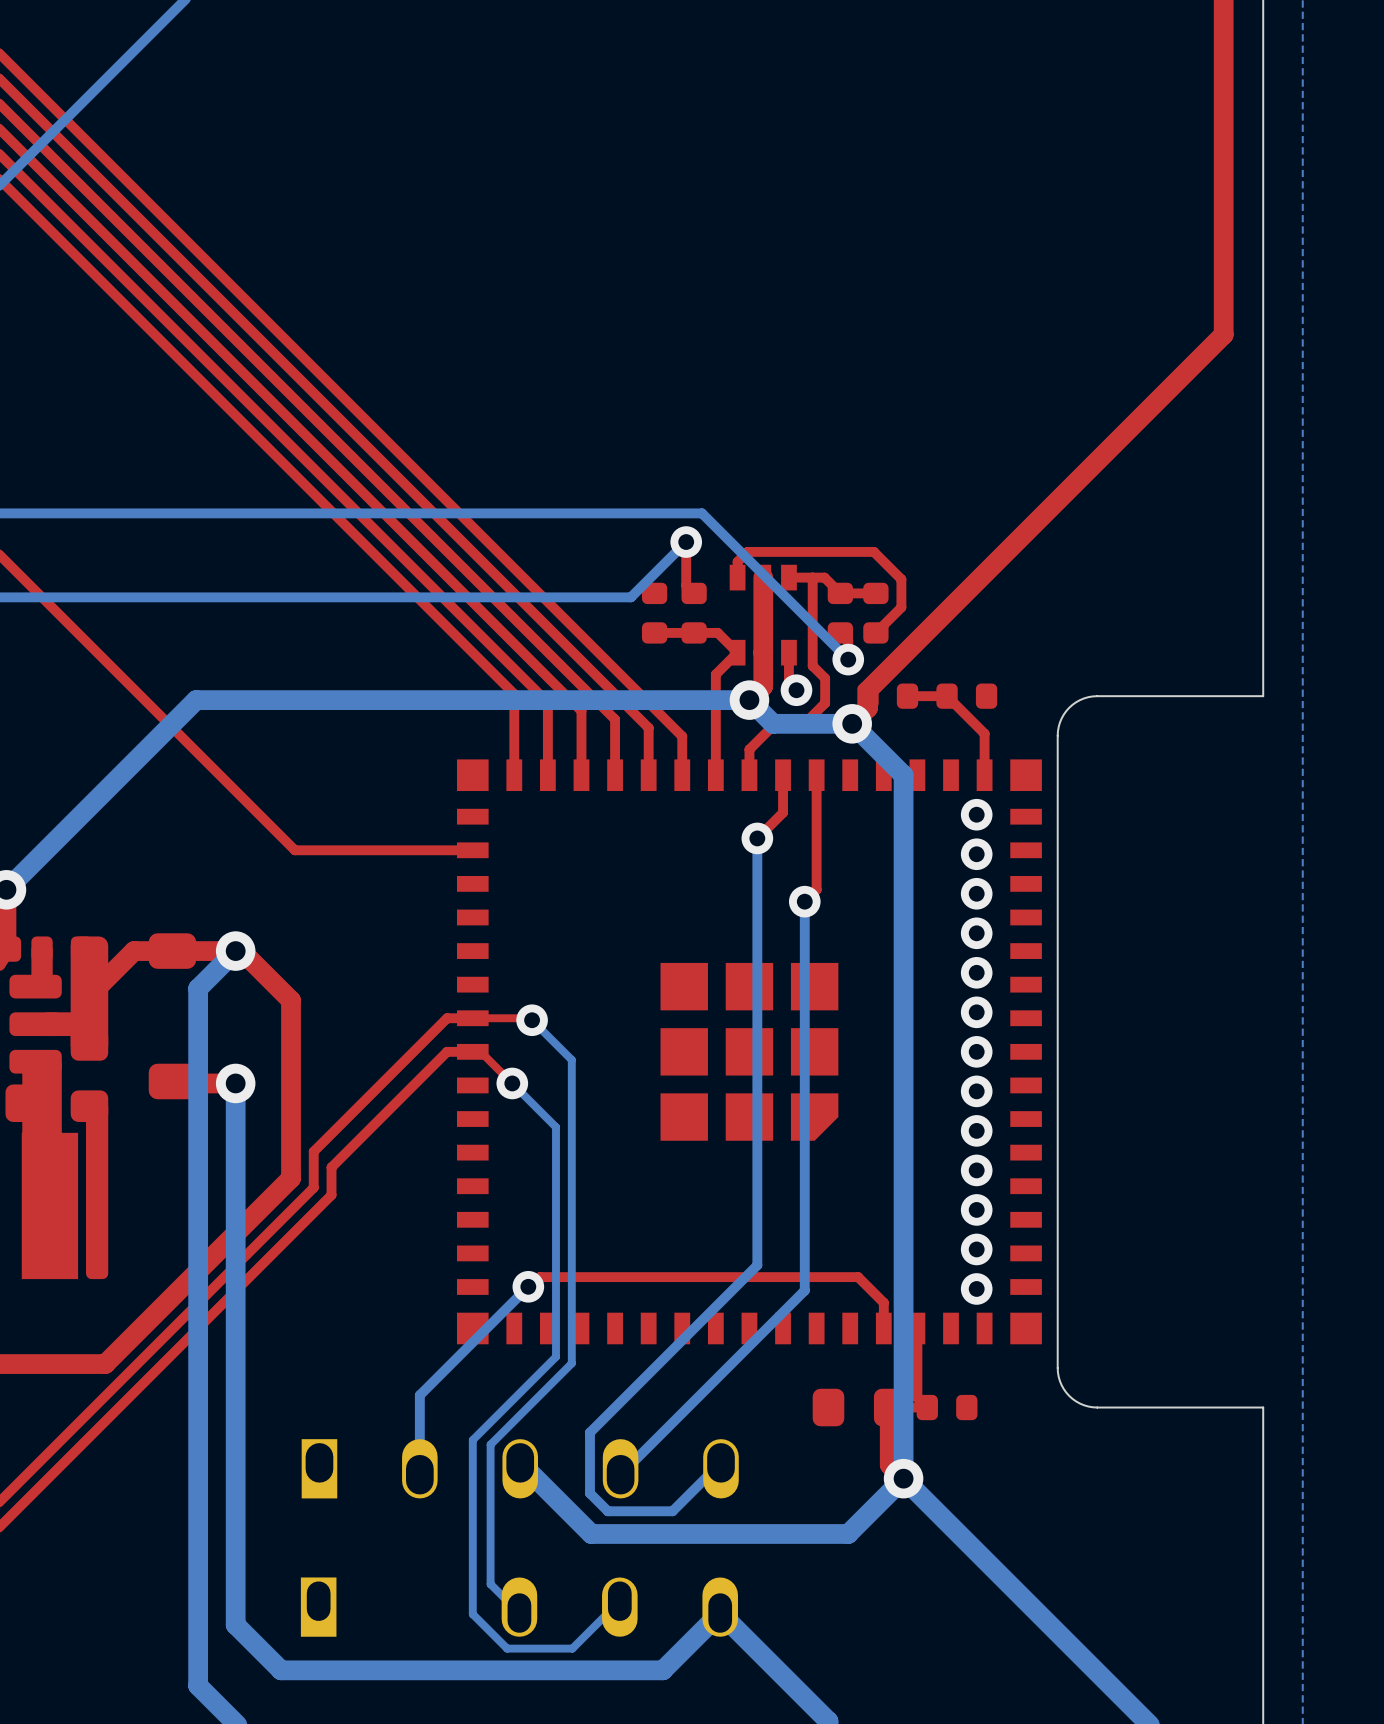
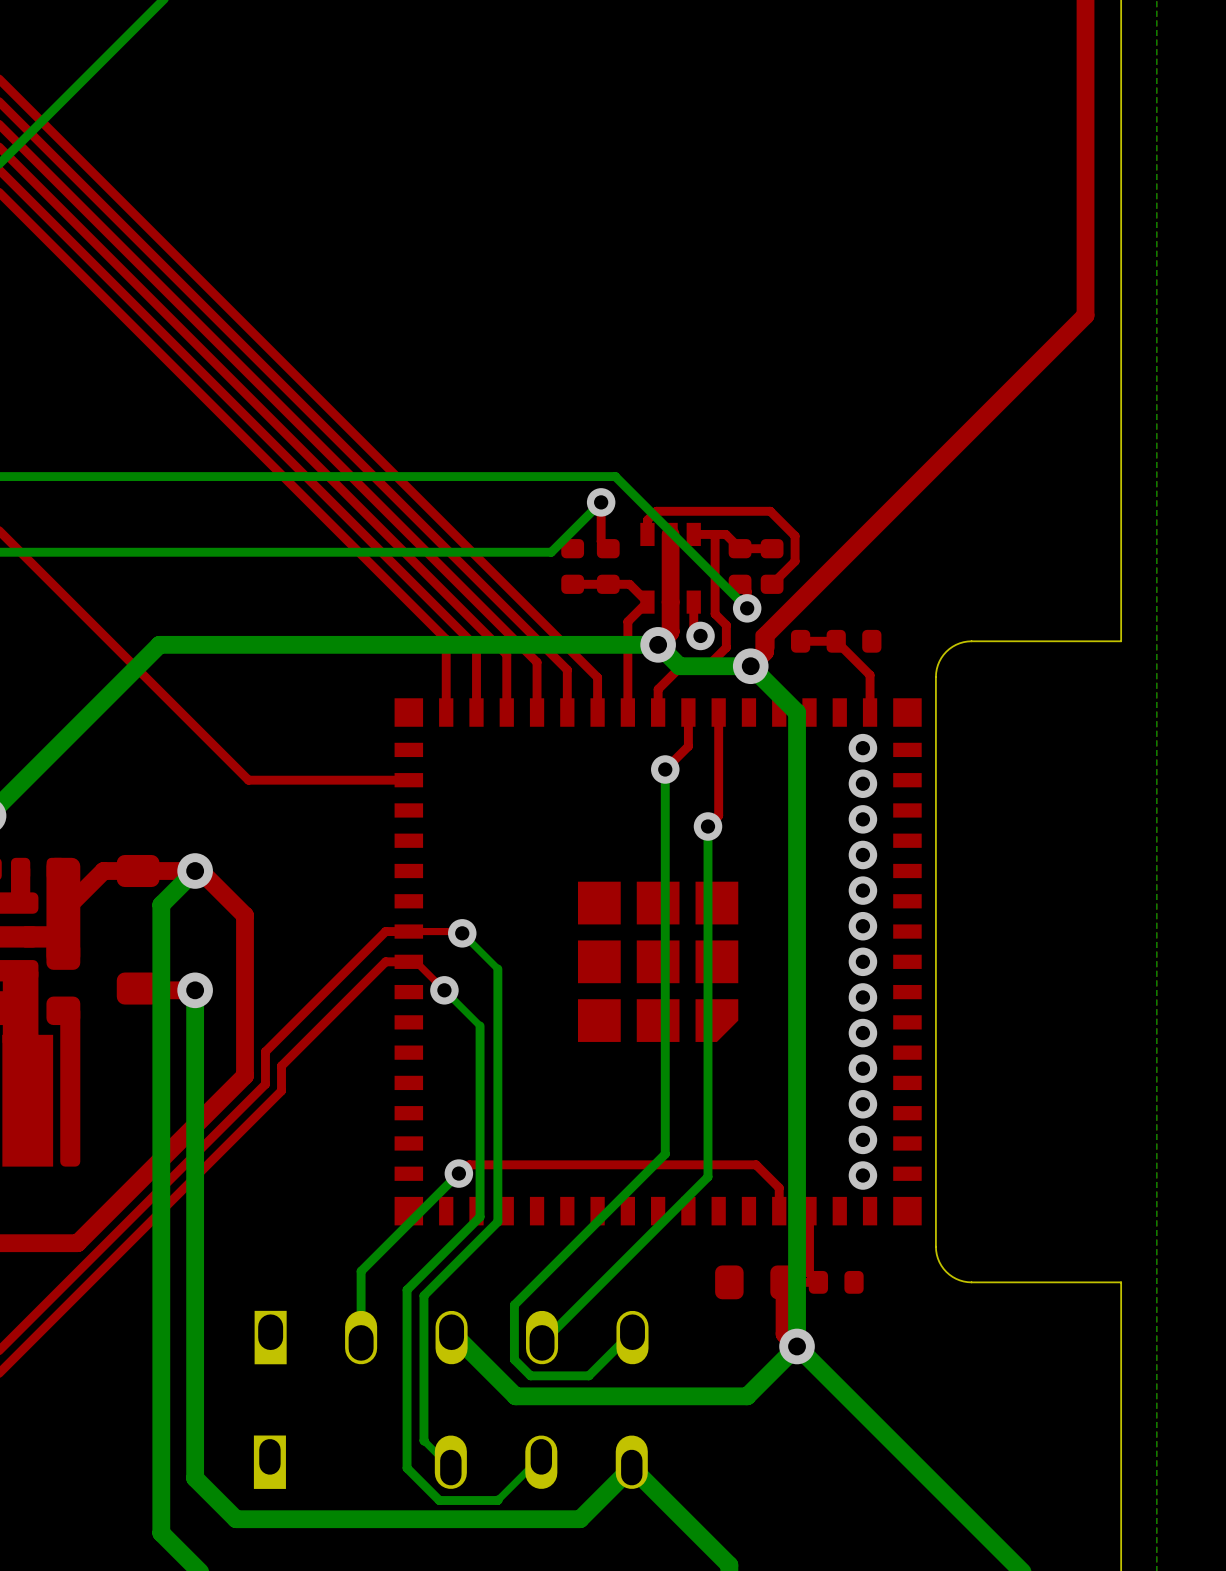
bottom track: (571, 1059) (571, 1363) (490, 1444) (490, 1584) -> (497, 968) (497, 1221) (423, 1295) (424, 1441)
bottom track: (551, 1123) (555, 1127) (555, 1356) (472, 1440) (472, 1614) (507, 1648) (572, 1648) -> (480, 1025) (480, 1216) (407, 1289) (407, 1468) (439, 1500) (498, 1499)

